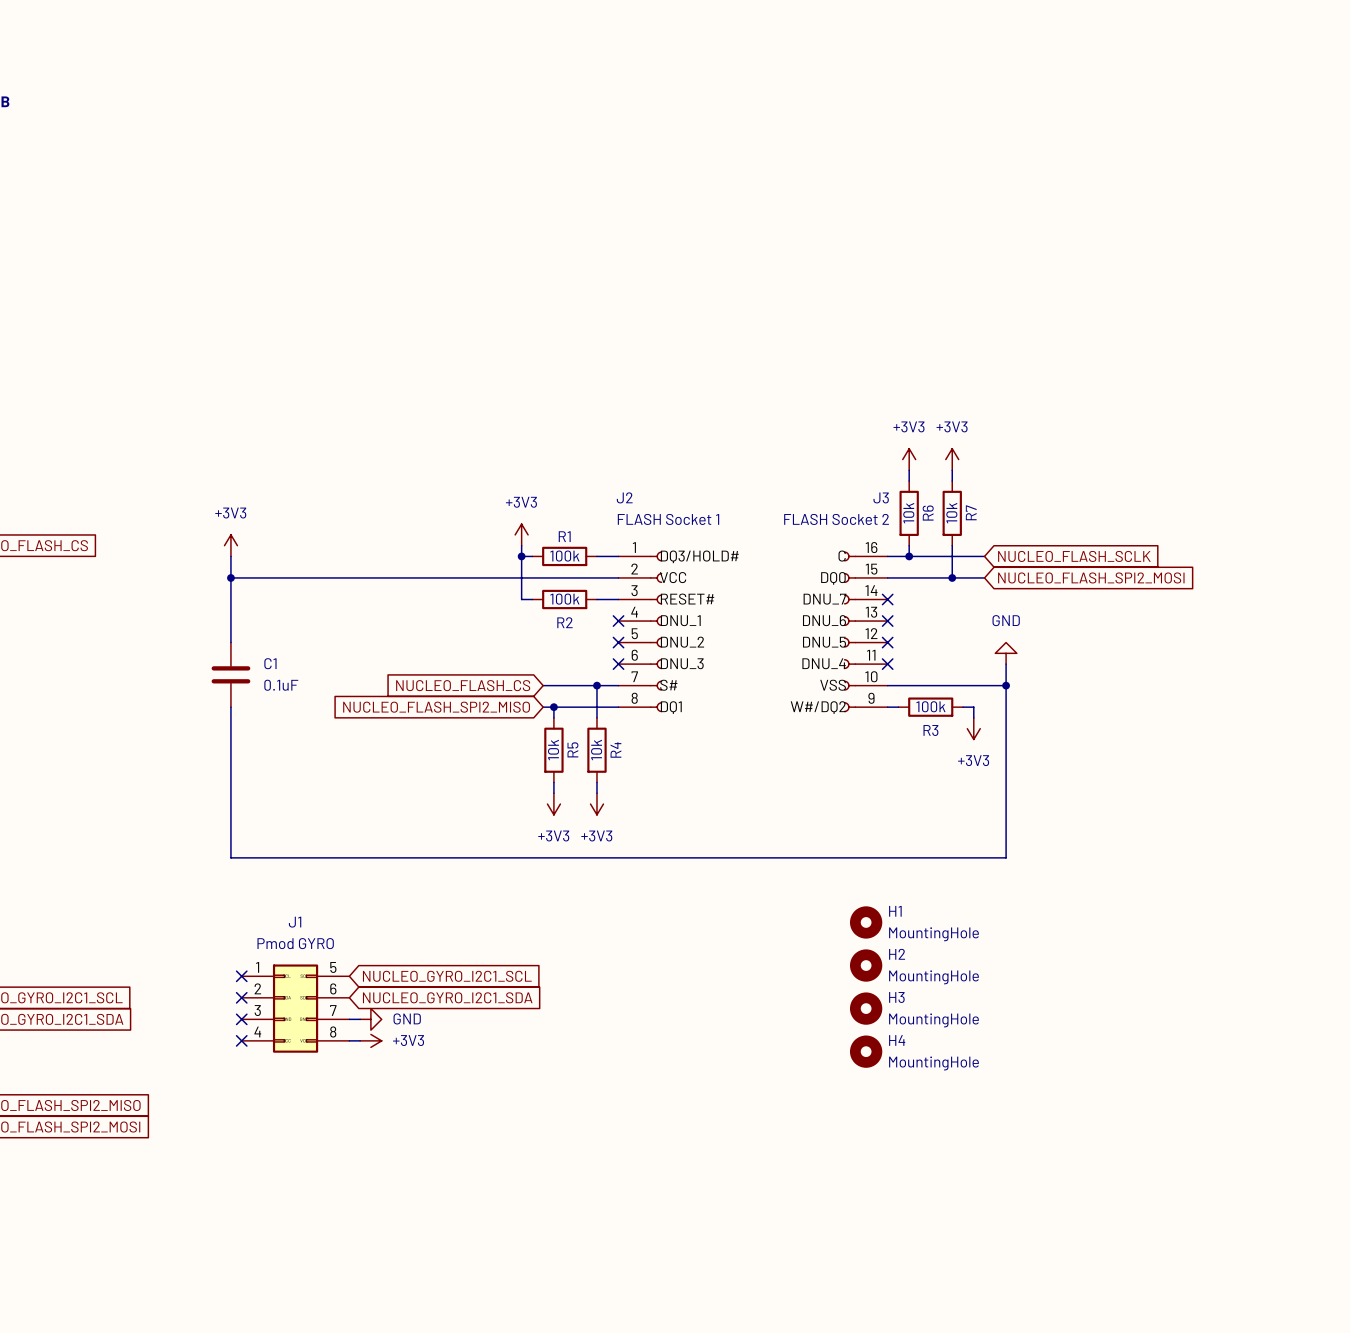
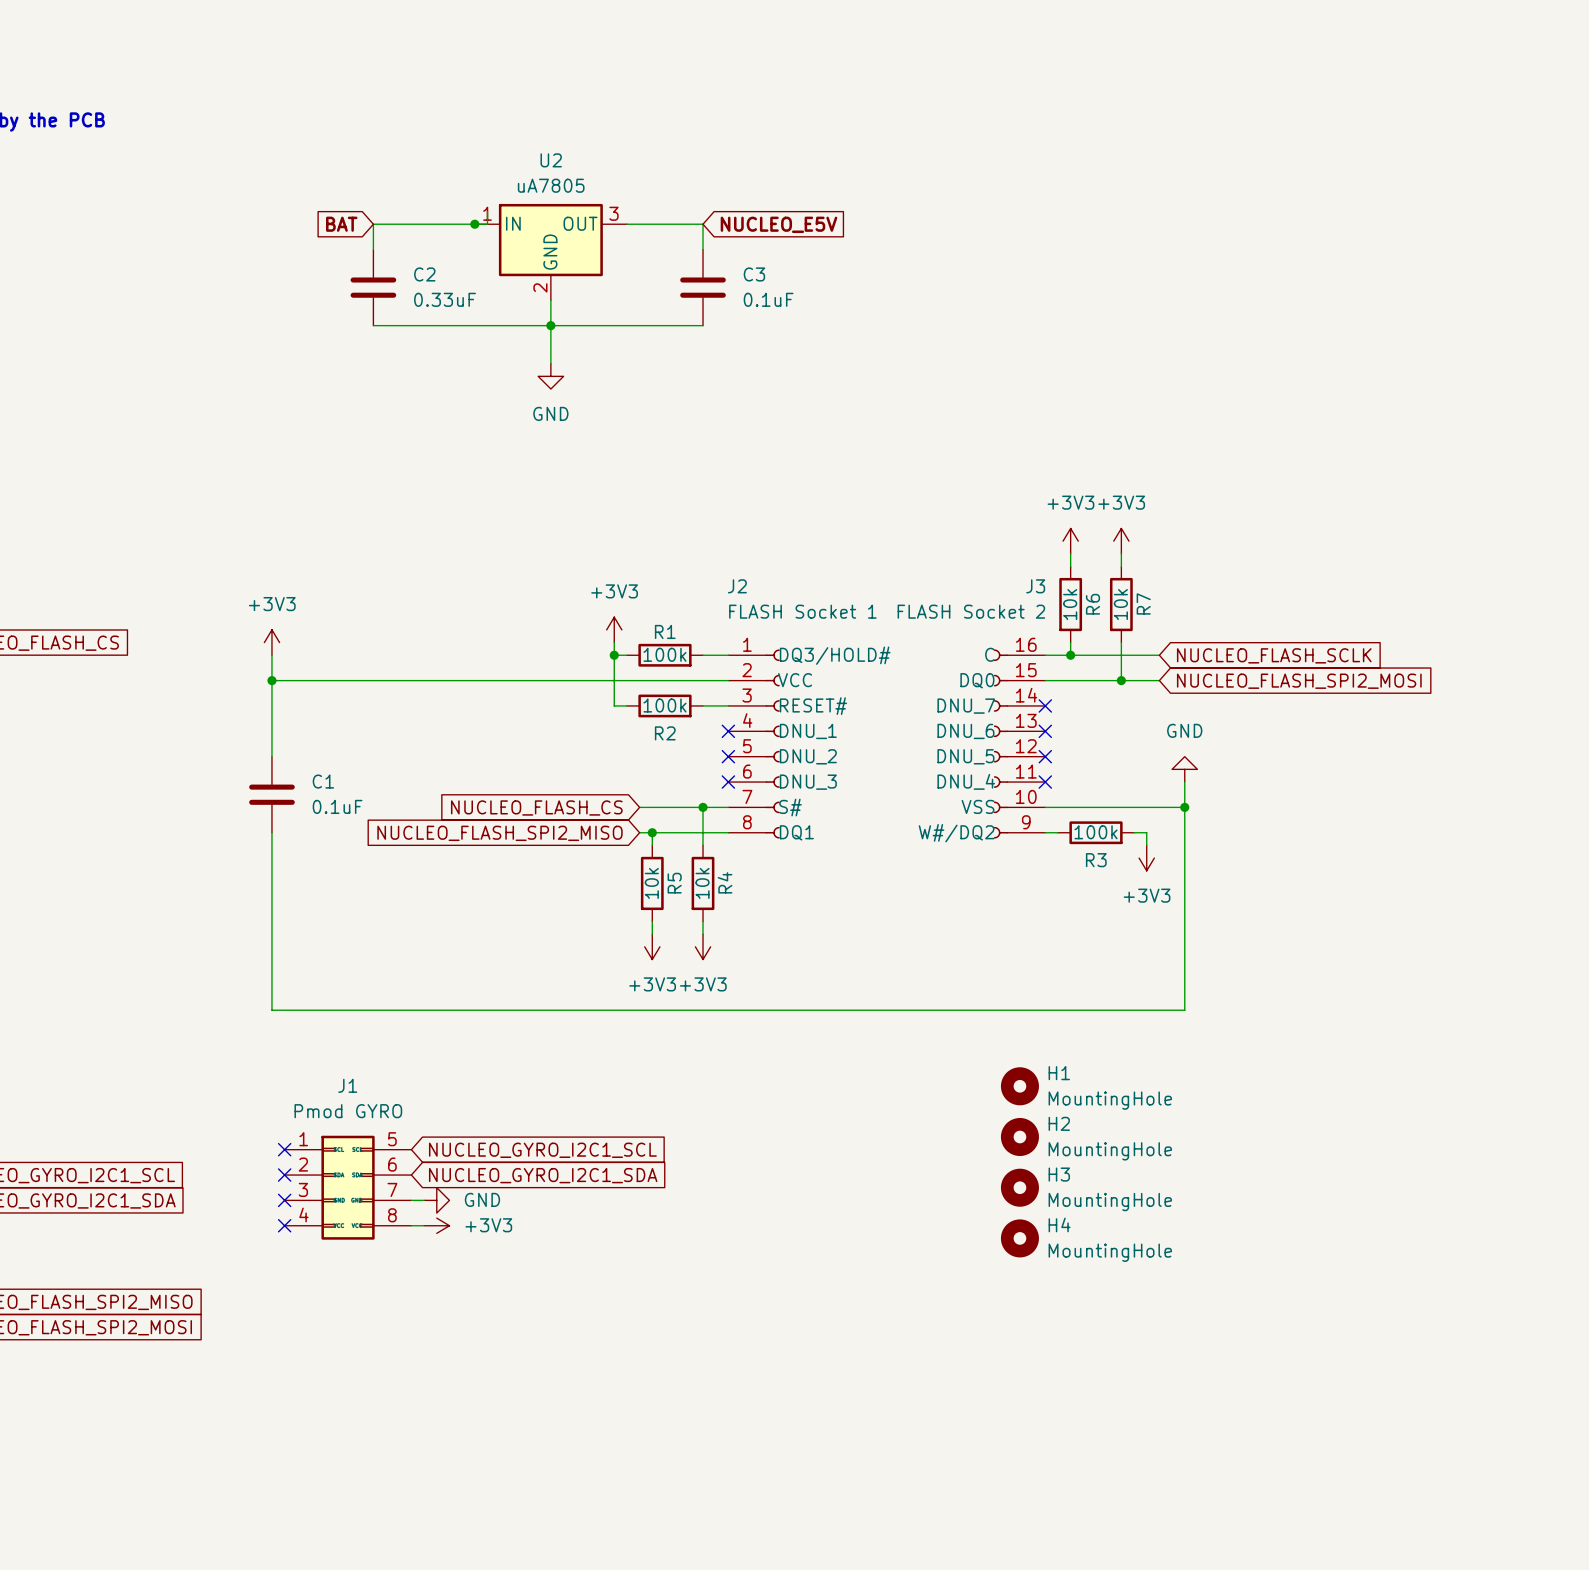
wire: none -> (487, 211) (487, 224) (373, 224) (373, 249)
global label: none -> BAT (341, 224)
junction: none -> (474, 224)
wire: none -> (626, 224) (703, 224) (703, 249)
global label: none -> NUCLEO_E5V (779, 224)
U2: none -> uA7805 (550, 252)
C2: none -> 0.33uF (373, 287)
C3: none -> 0.1uF (703, 287)
wire: none -> (550, 300) (550, 363)
wire: none -> (373, 325) (703, 325)
junction: none -> (550, 325)
power symbol: none -> GND (550, 376)

